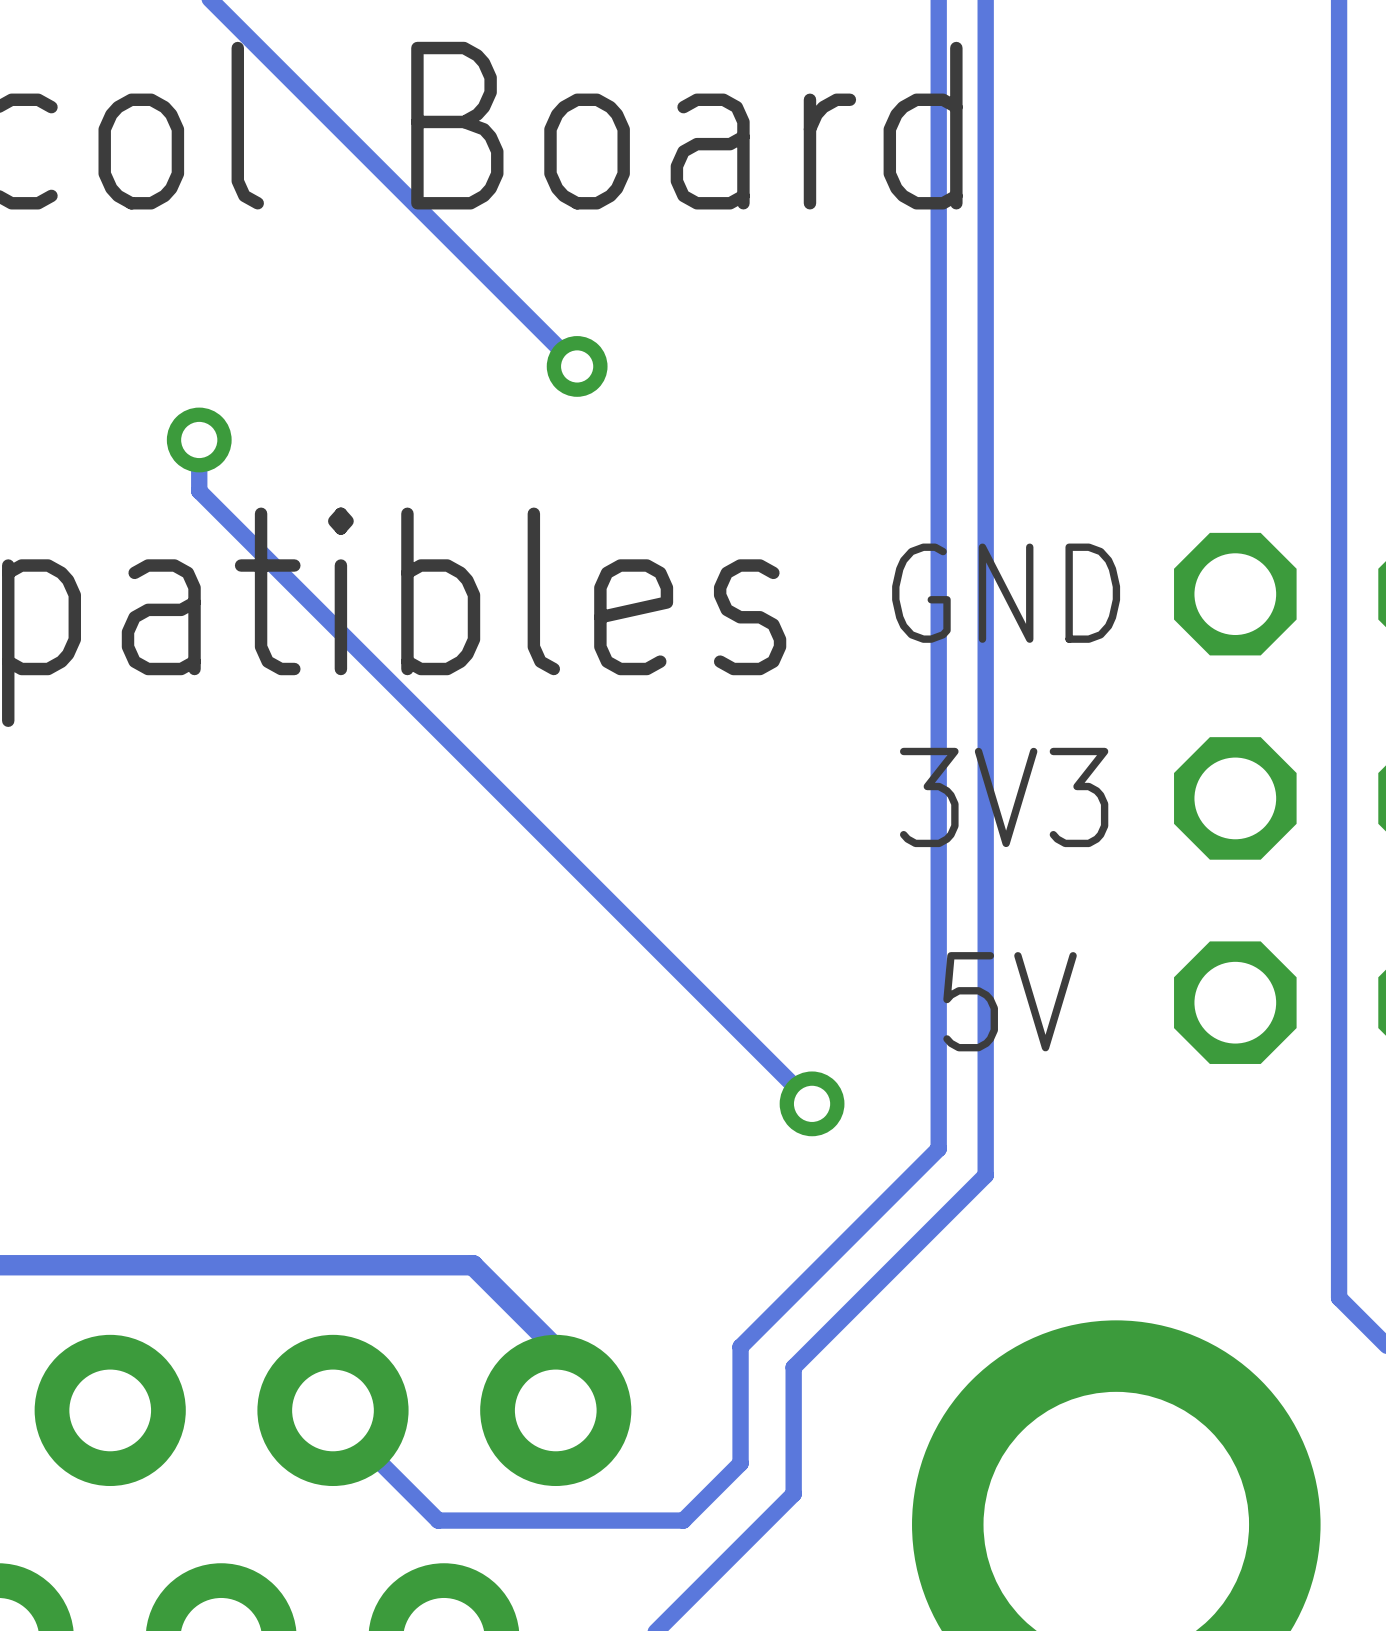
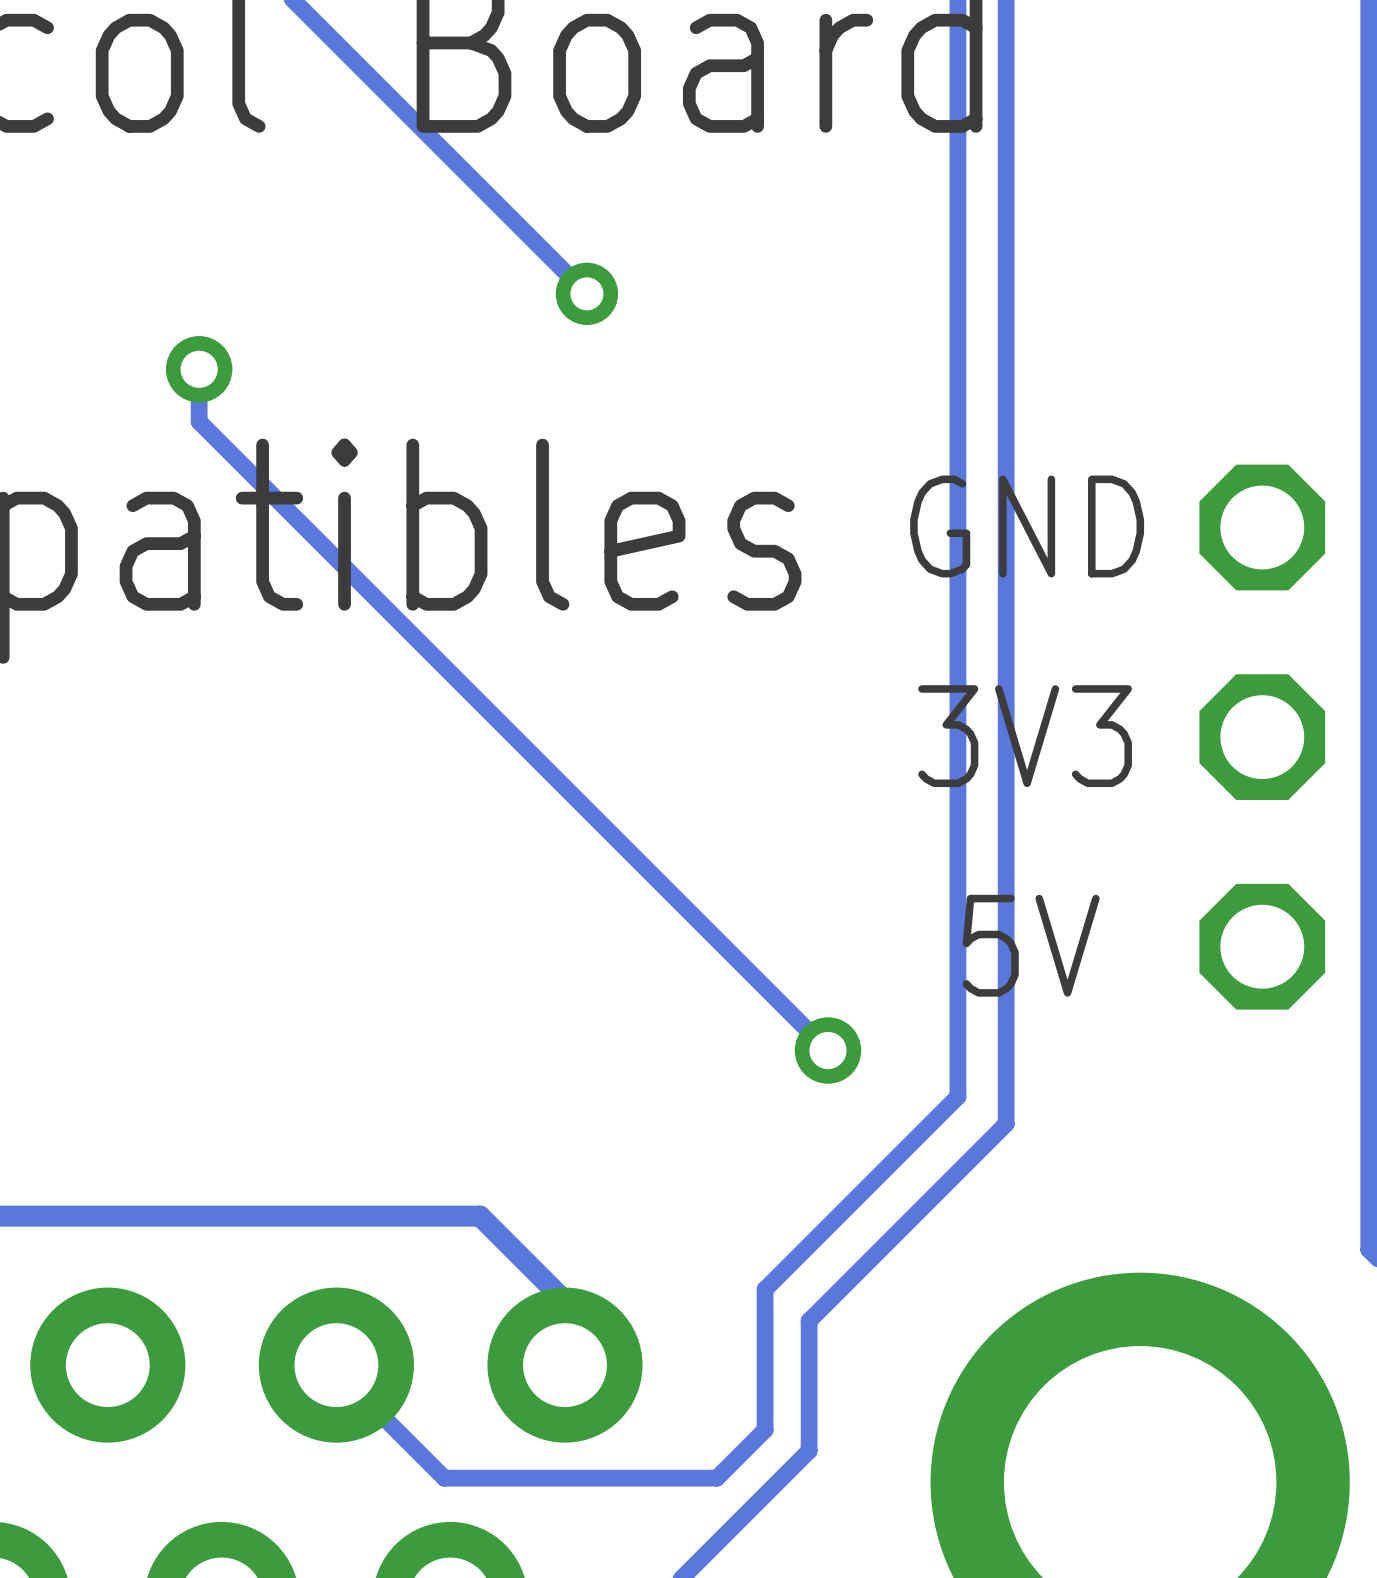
track: (750, 1336) (740, 1346) (740, 1463) (683, 1520) -> (765, 1289) (765, 1429) (716, 1478) (695, 1478)

